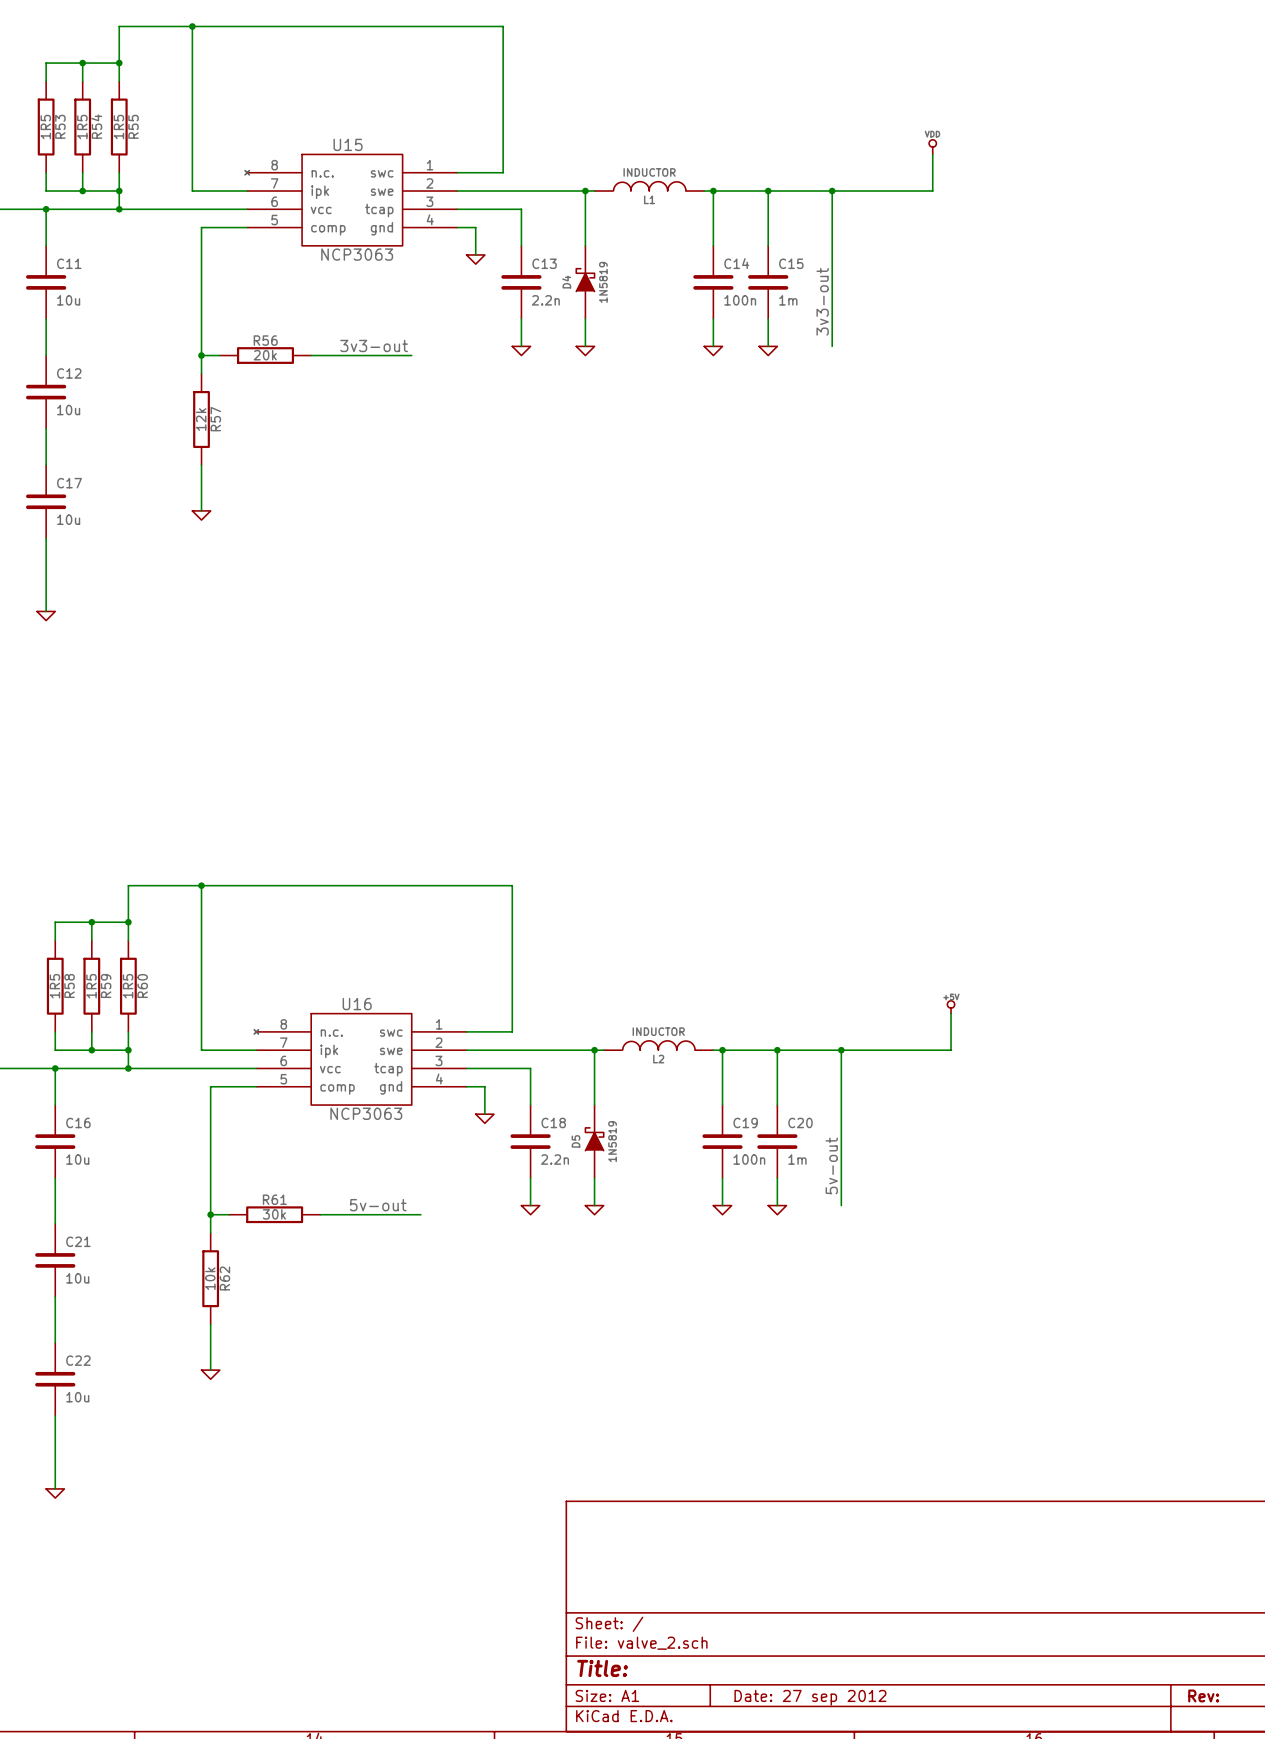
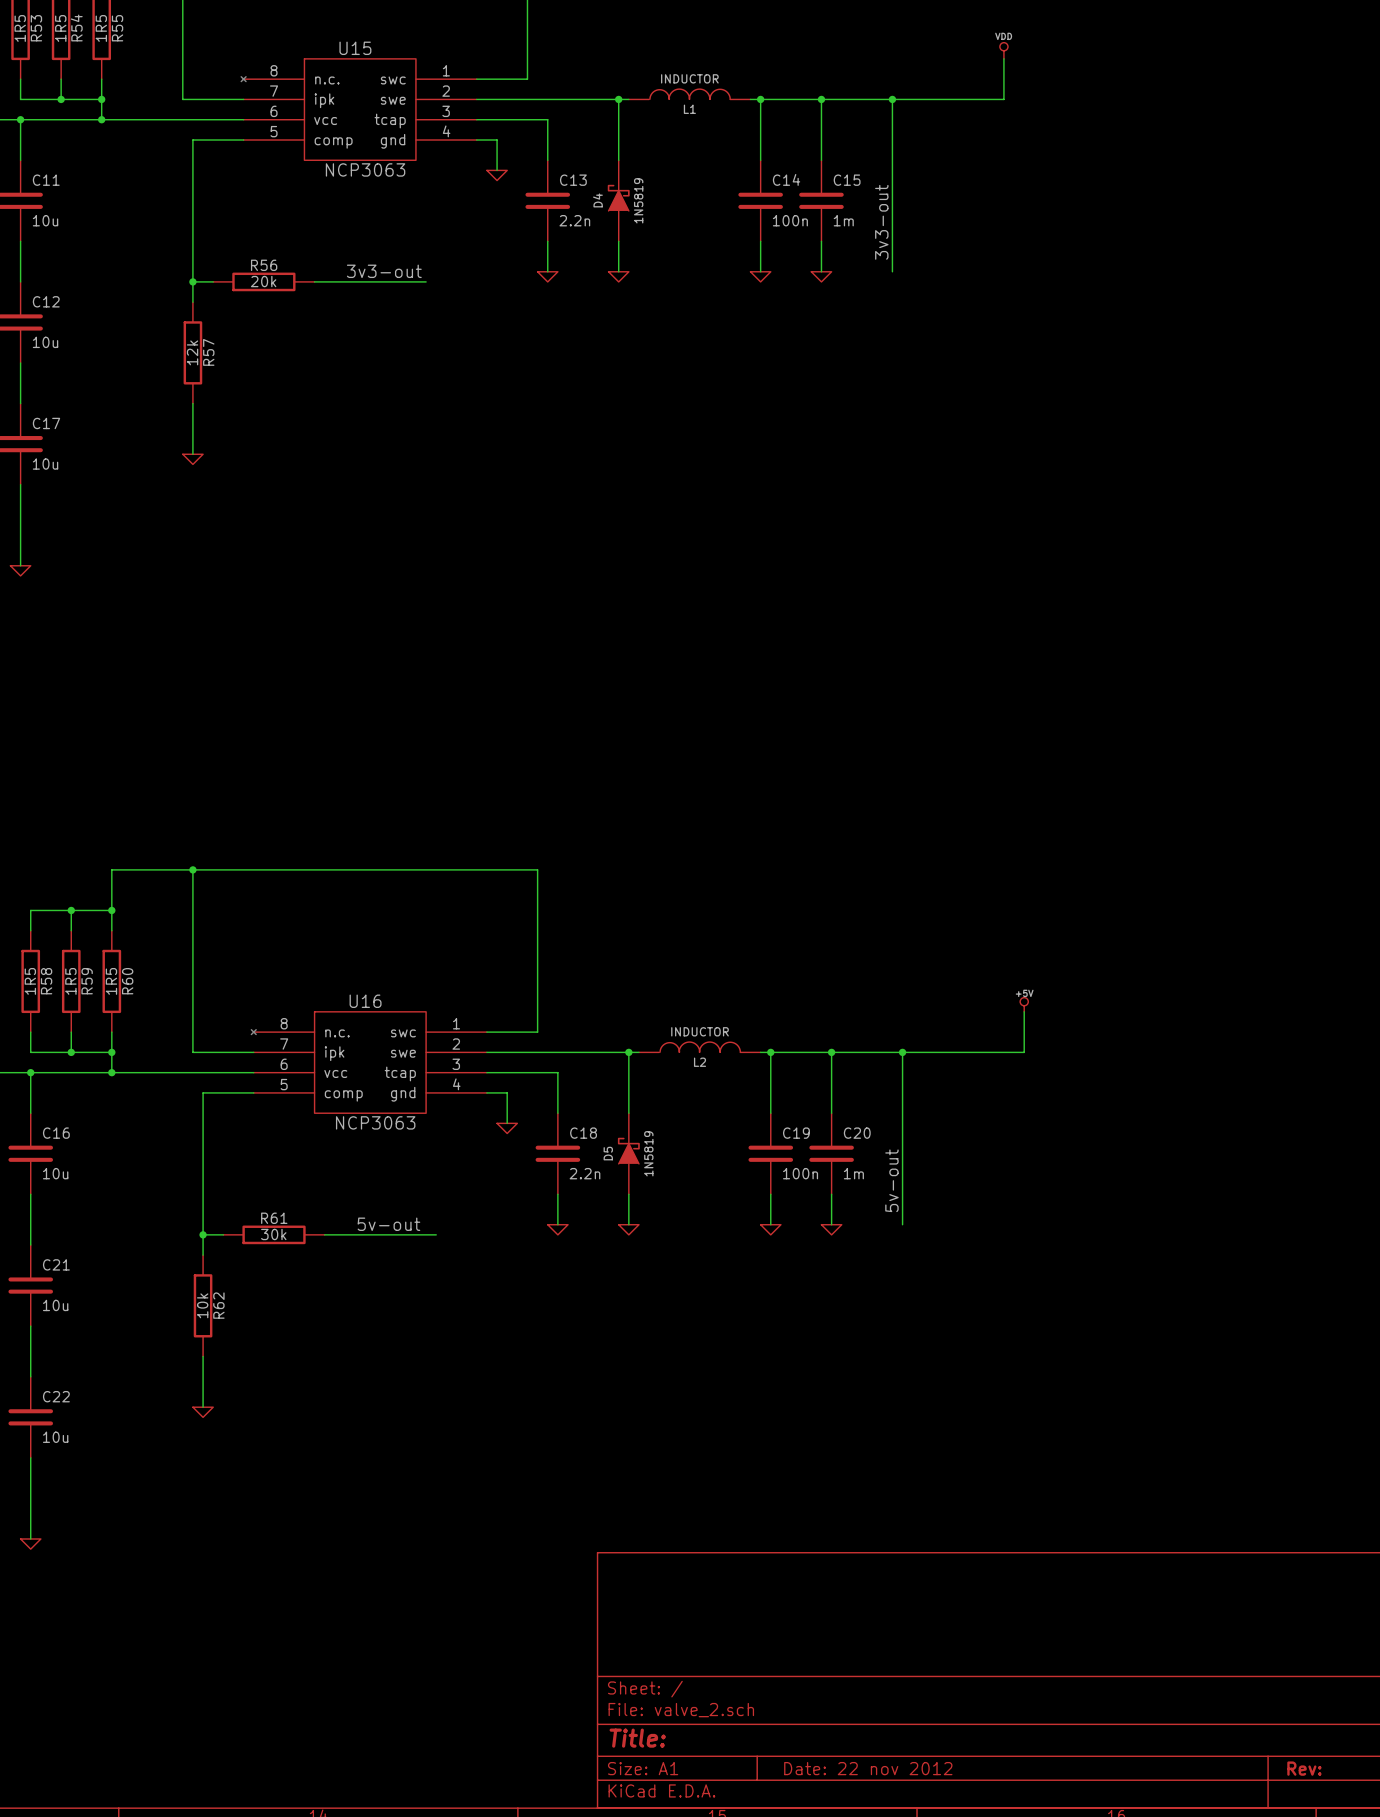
title block: Date: 27 sep 2012 (810, 1697) -> Date: 22 nov 2012 (868, 1768)

